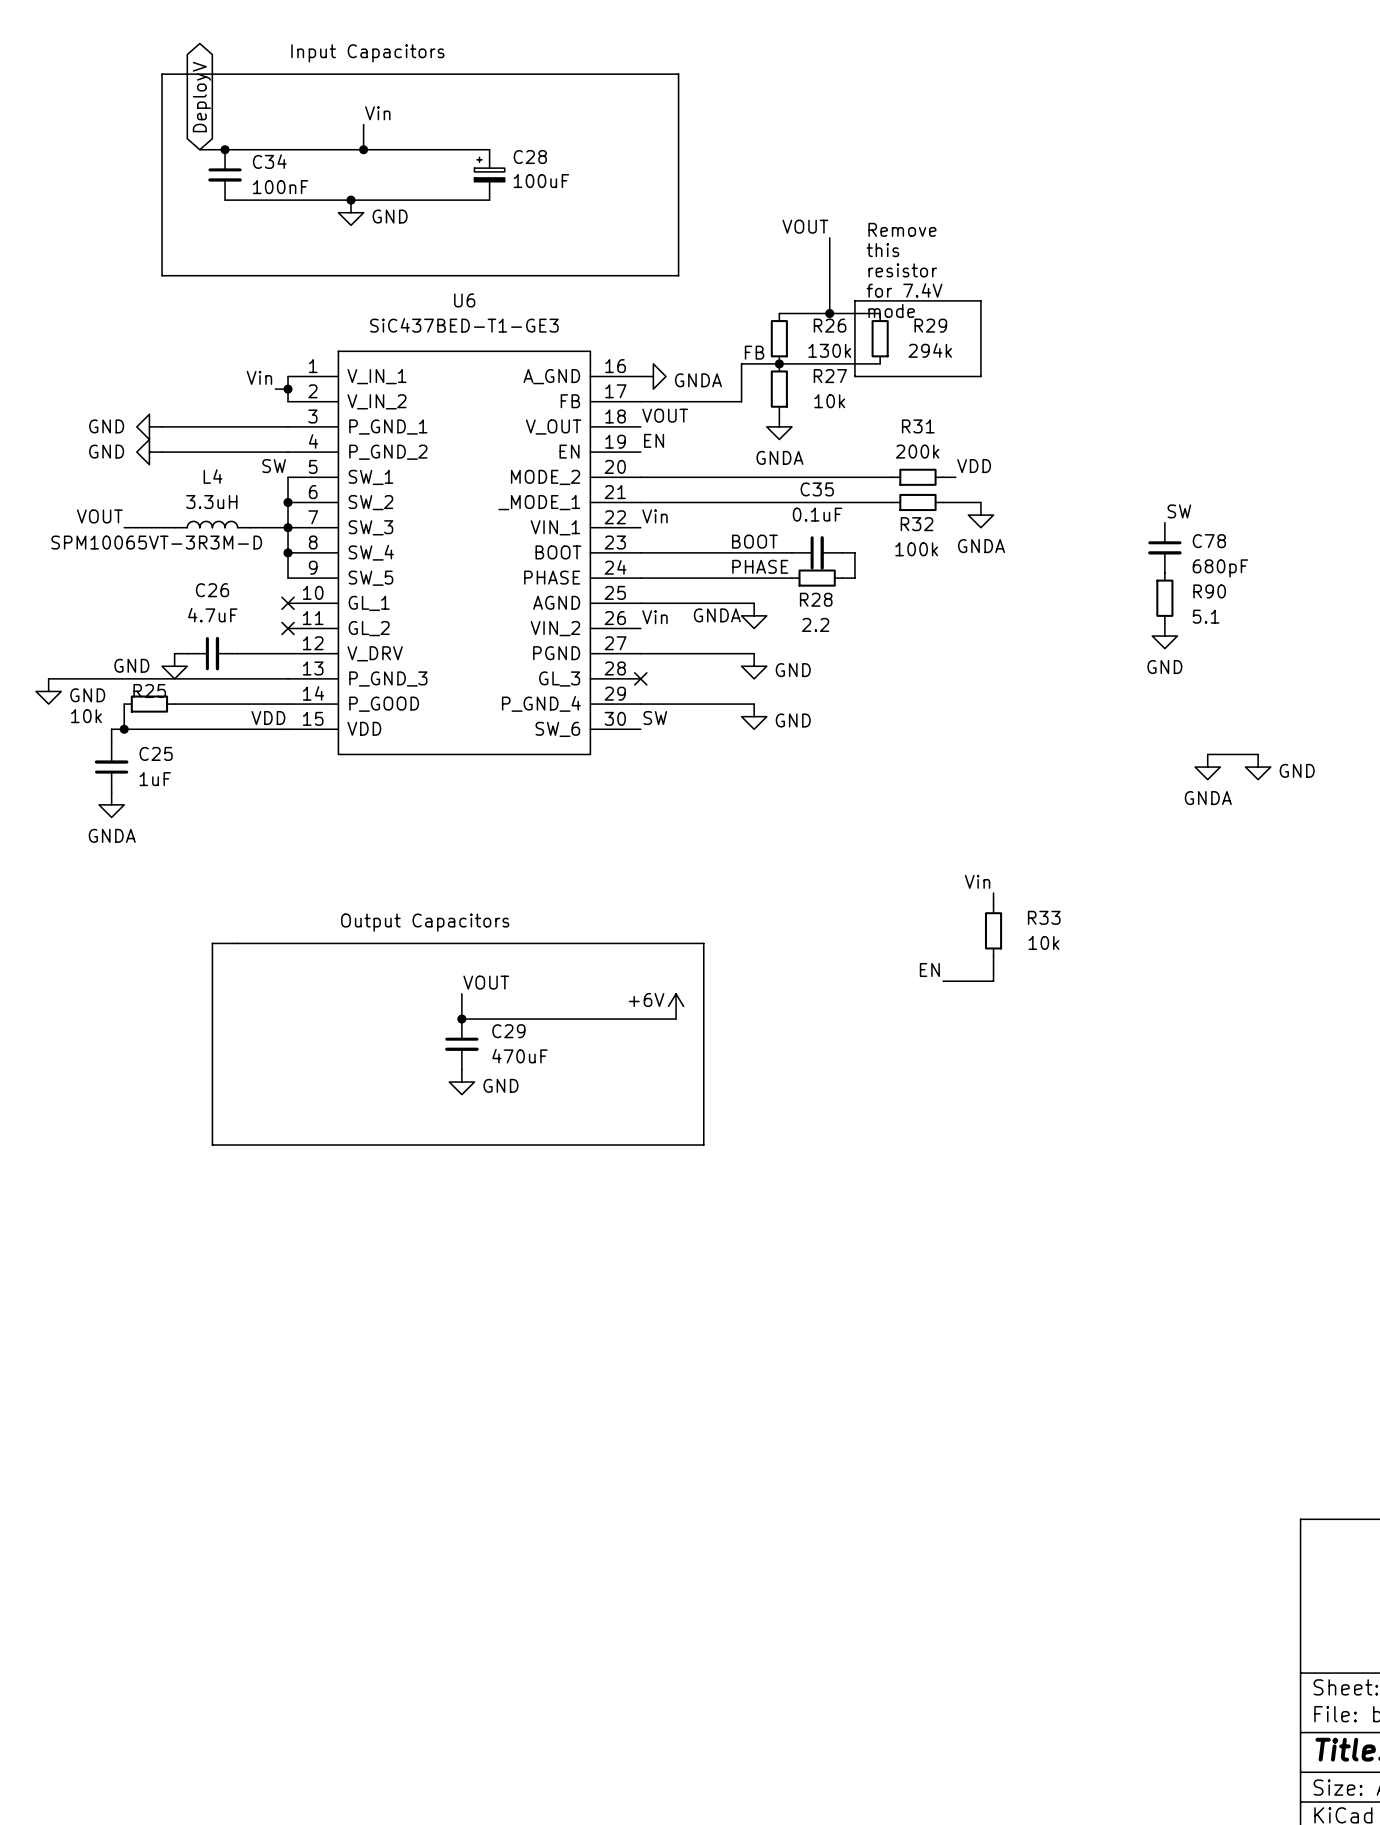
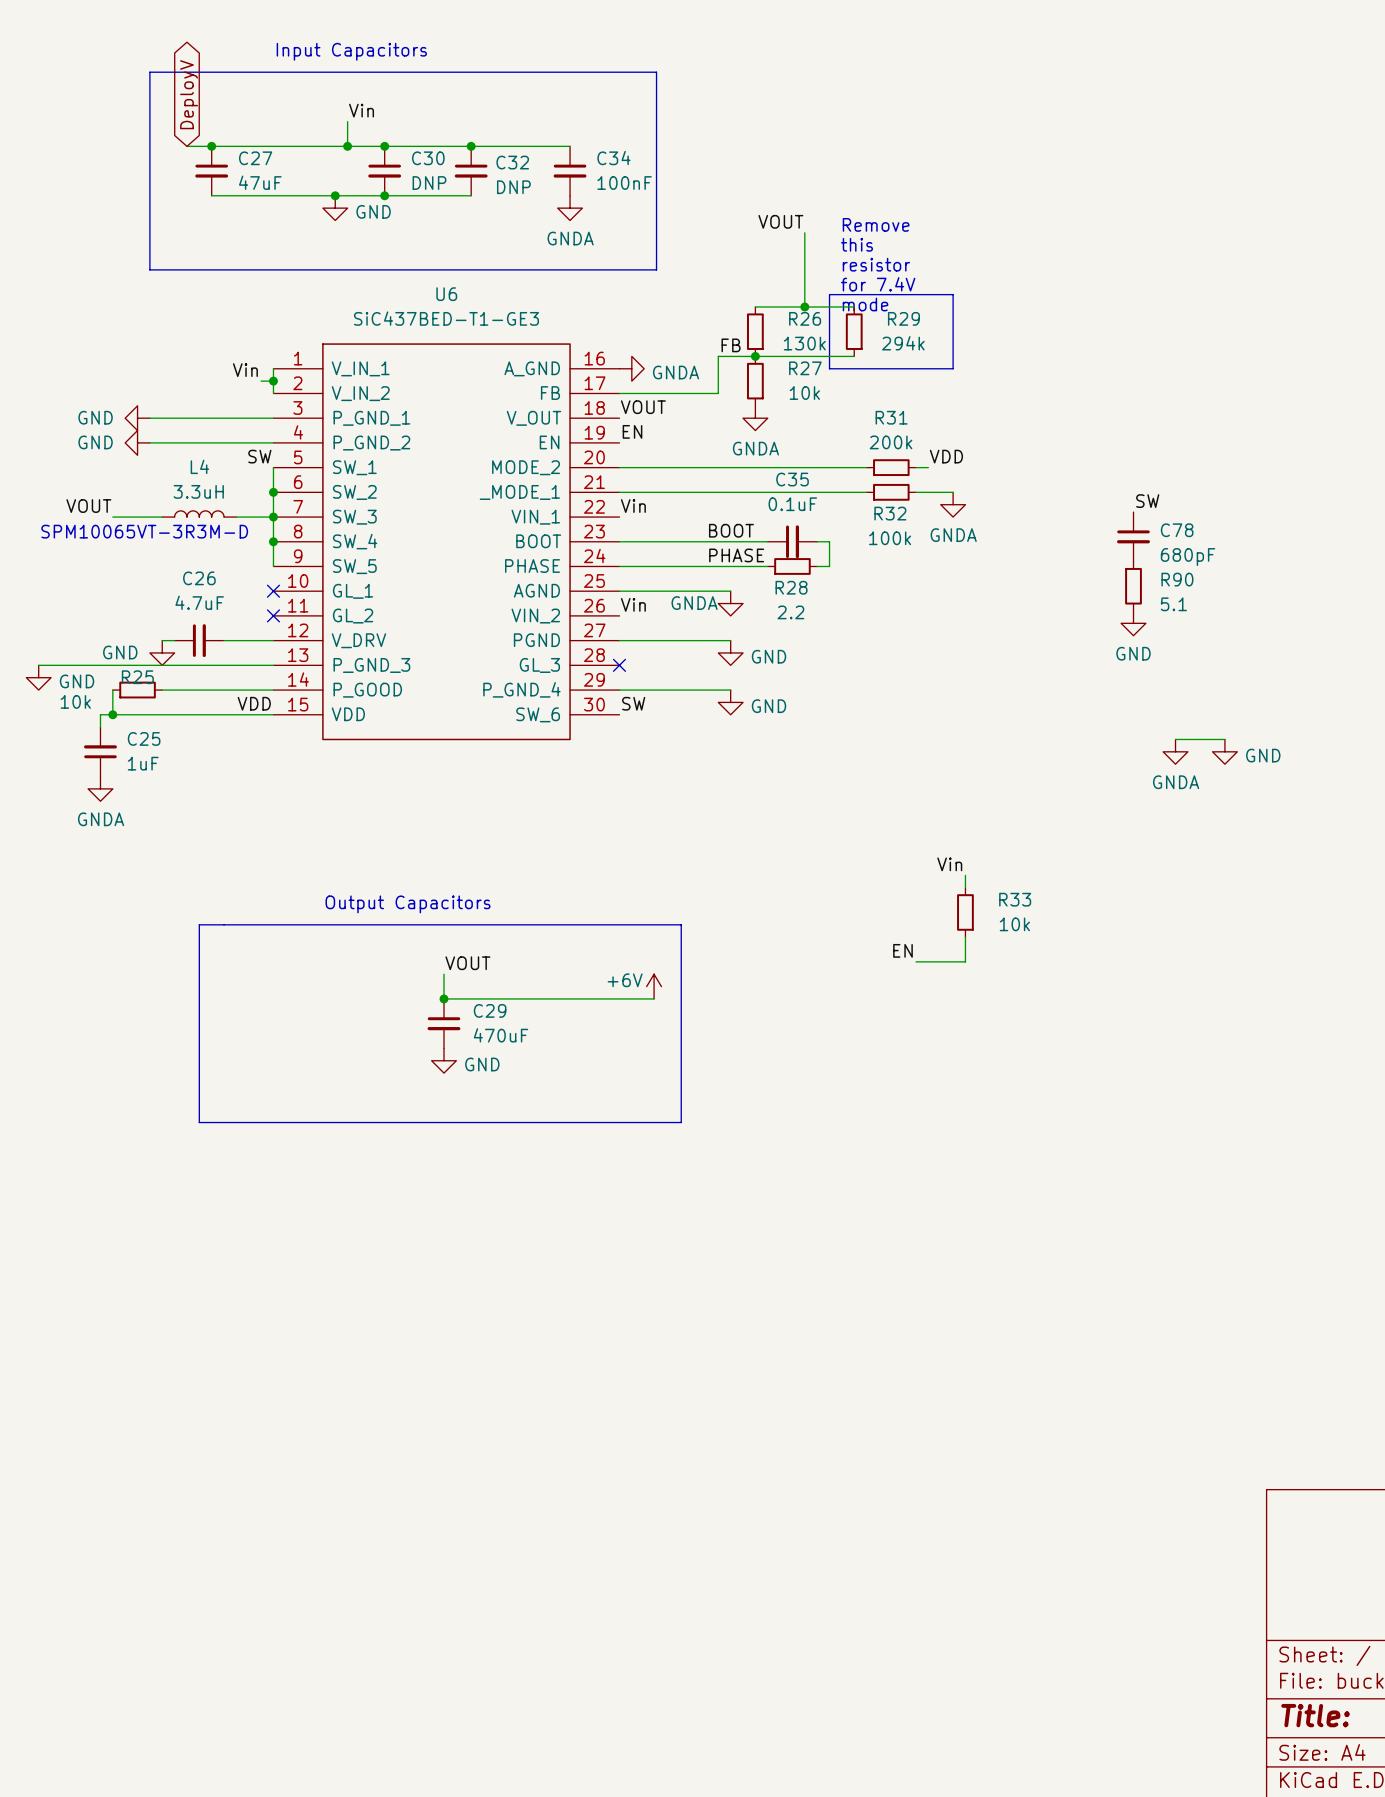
junction: none -> (384, 146)
wire: none -> (471, 146) (570, 146)
junction: none -> (471, 146)
C34 name: C34 (269, 161) -> C27 (255, 158)
C30: none -> DNP (384, 171)
C28: 100uF (489, 174) -> none
C32: none -> DNP (471, 171)
C34: none -> 100nF (570, 171)
C34 value: 100nF (280, 187) -> 47uF (260, 182)
junction: none -> (384, 195)
power symbol: none -> GNDA (570, 208)

